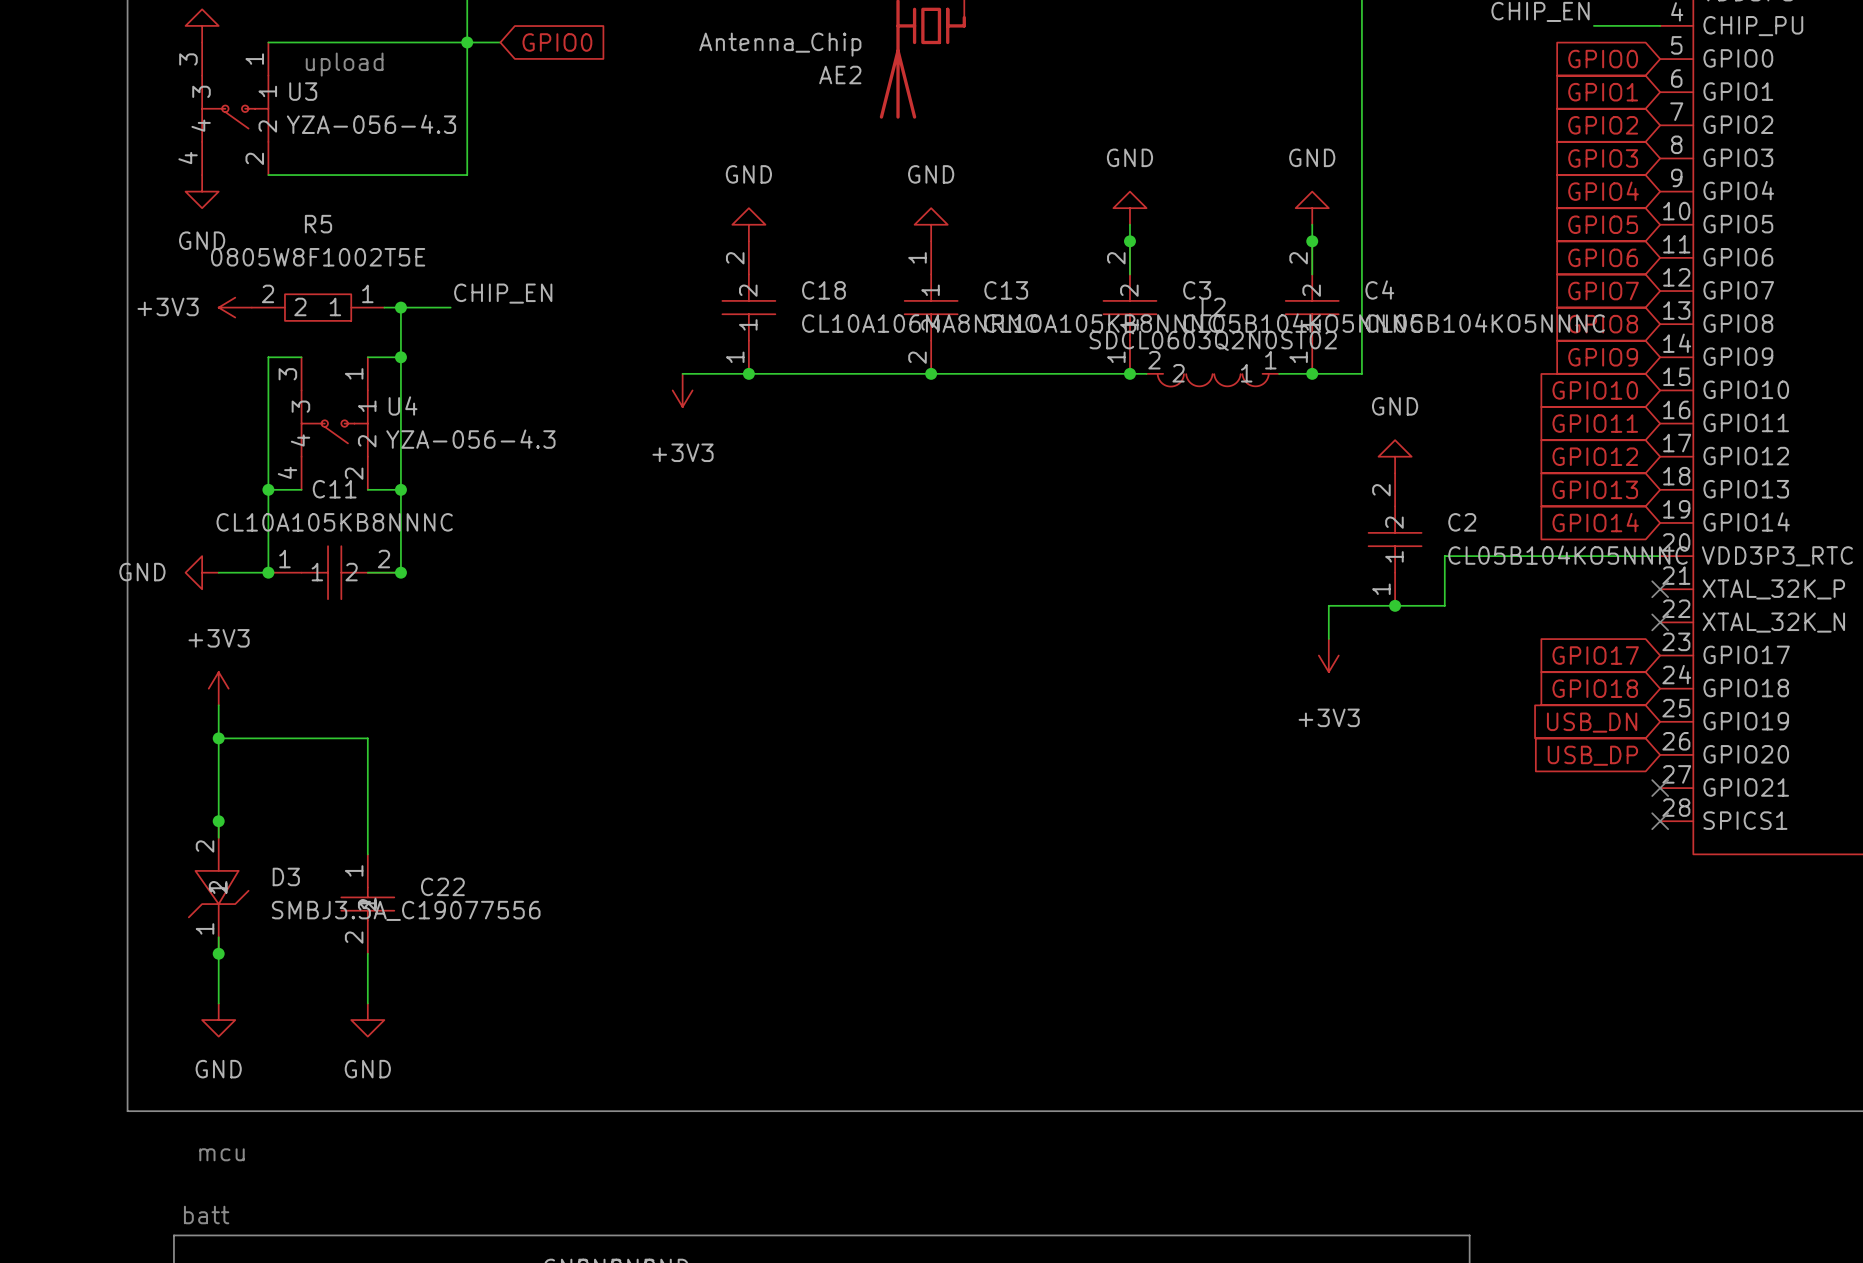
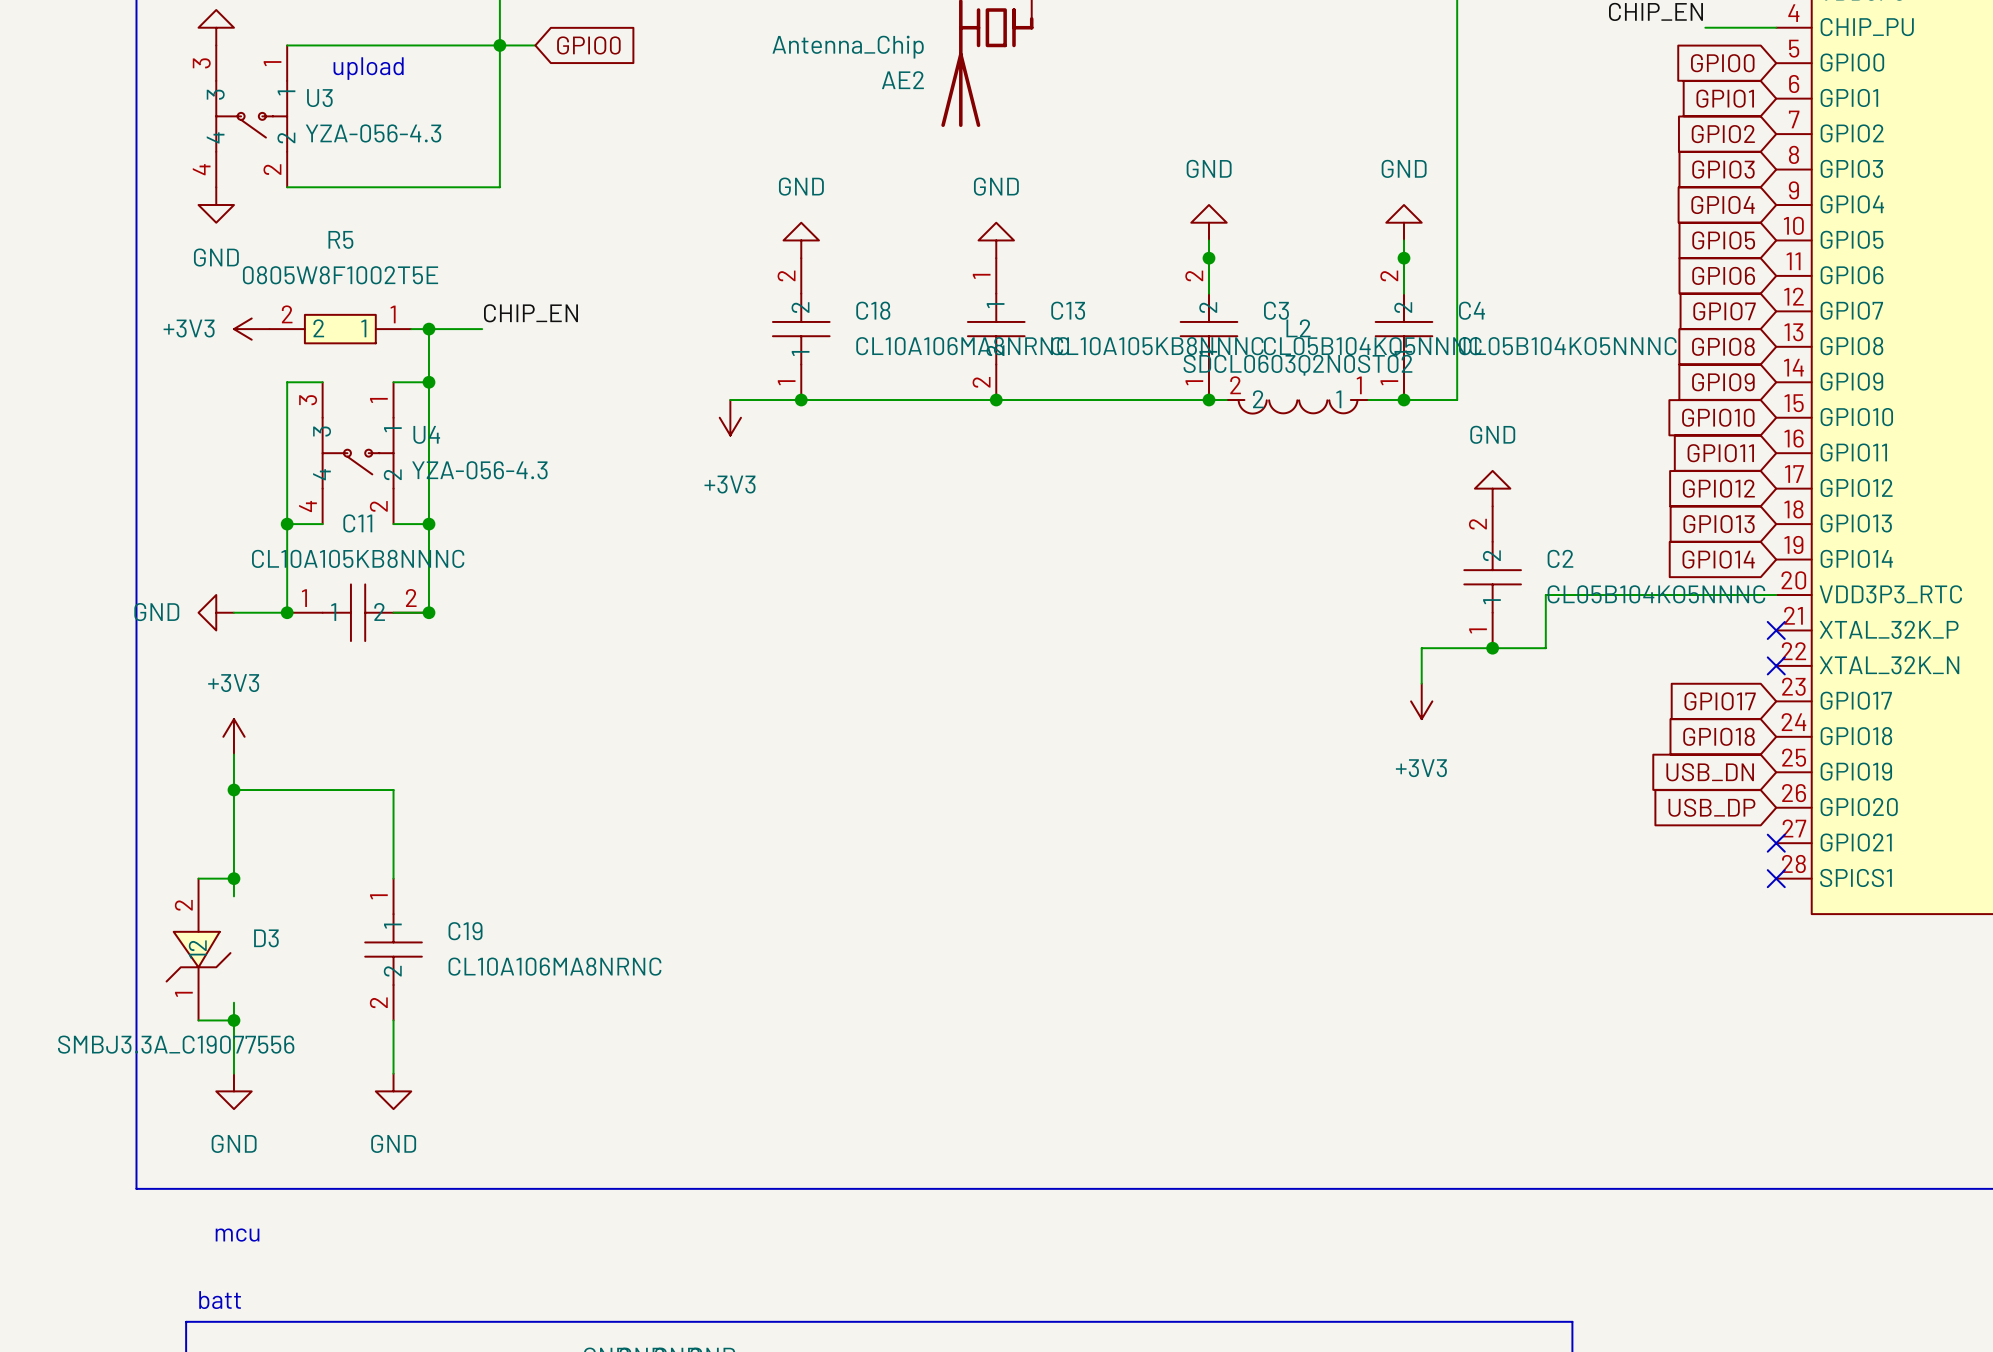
wire: none -> (198, 878) (233, 878)
D3 position: (218, 887) -> (198, 949)
C19: none -> CL10A106MA8NRNC (393, 949)
C22: (367, 904) -> none
D3 value position: SMBJ3.3A_C19077556 (406, 910) -> SMBJ3.3A_C19077556 (176, 1044)
wire: none -> (198, 1020) (233, 1020)

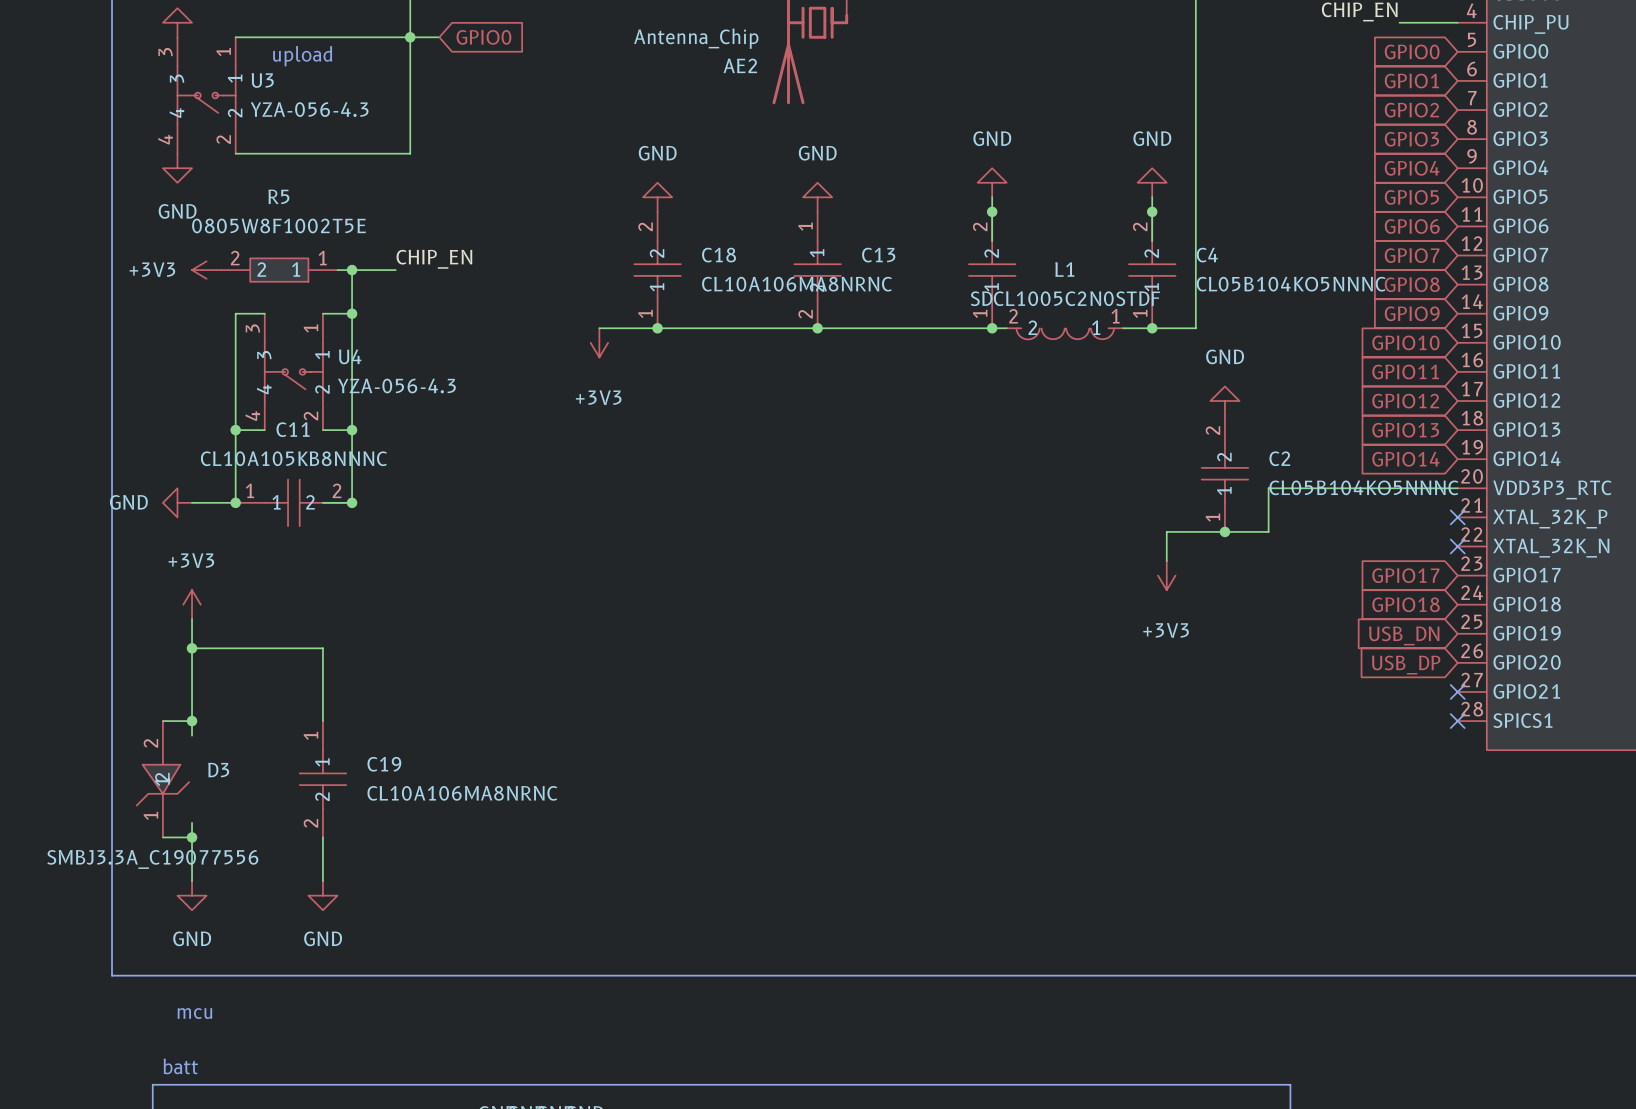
C3 name: C3 (1276, 310) -> none
L2 name: L2 (1298, 328) -> L1 (1064, 269)
C13 value: CL10A105KB8NNNC (1157, 346) -> none
C3 value: CL05B104KO5NNNC (1372, 346) -> none
L2 value: SDCL0603Q2N0ST02 (1297, 365) -> SDCL1005C2N0STDF (1065, 298)

